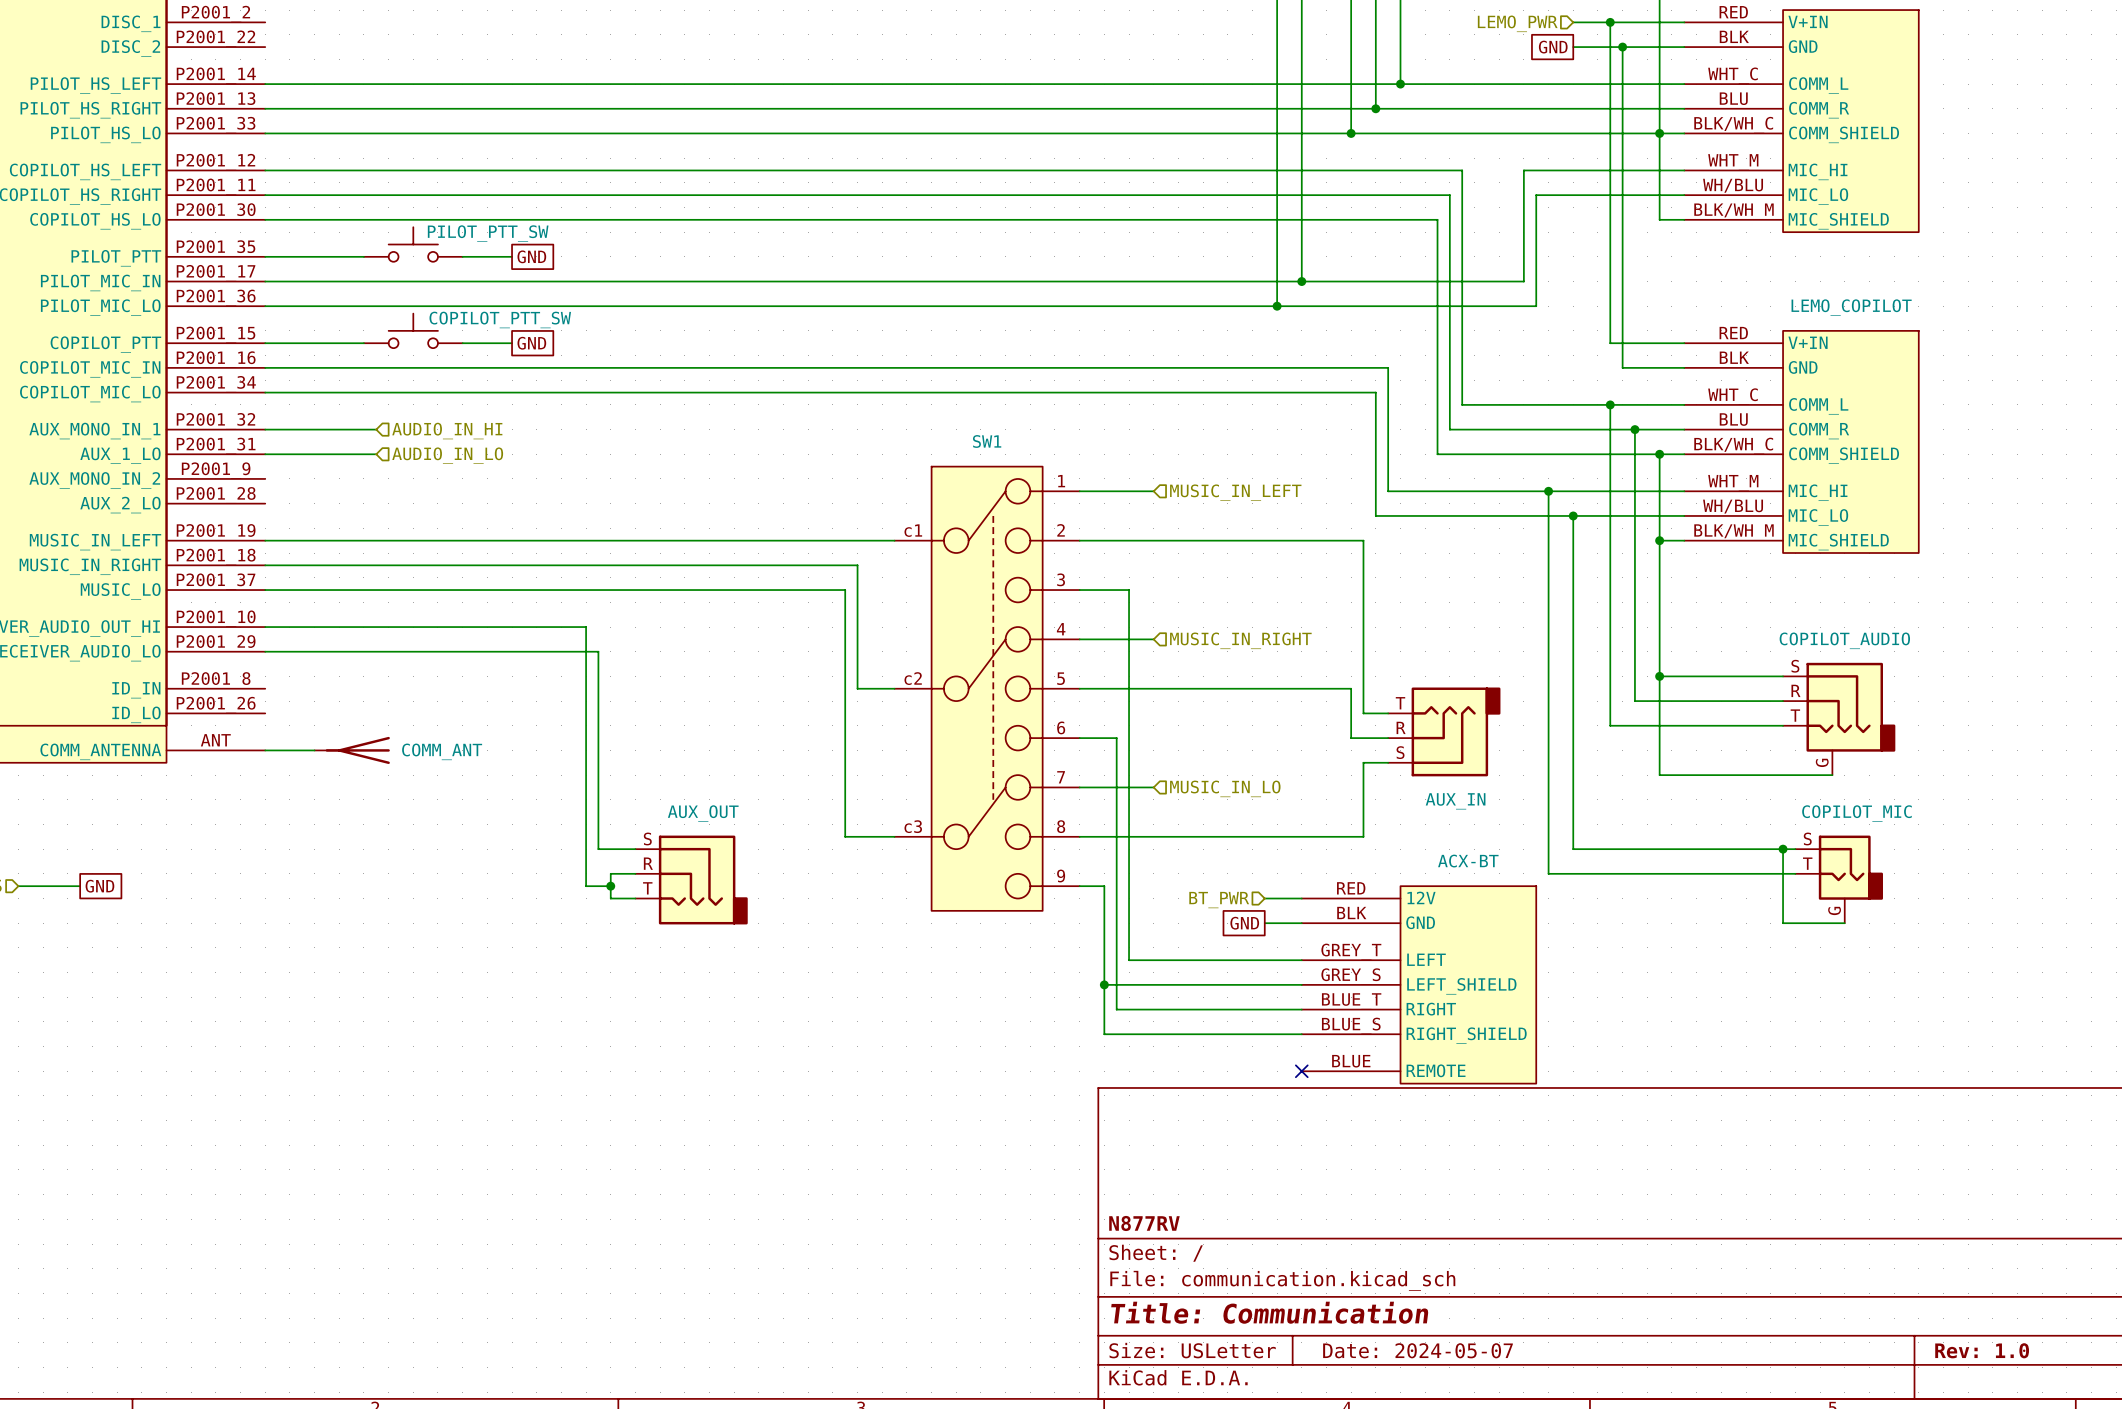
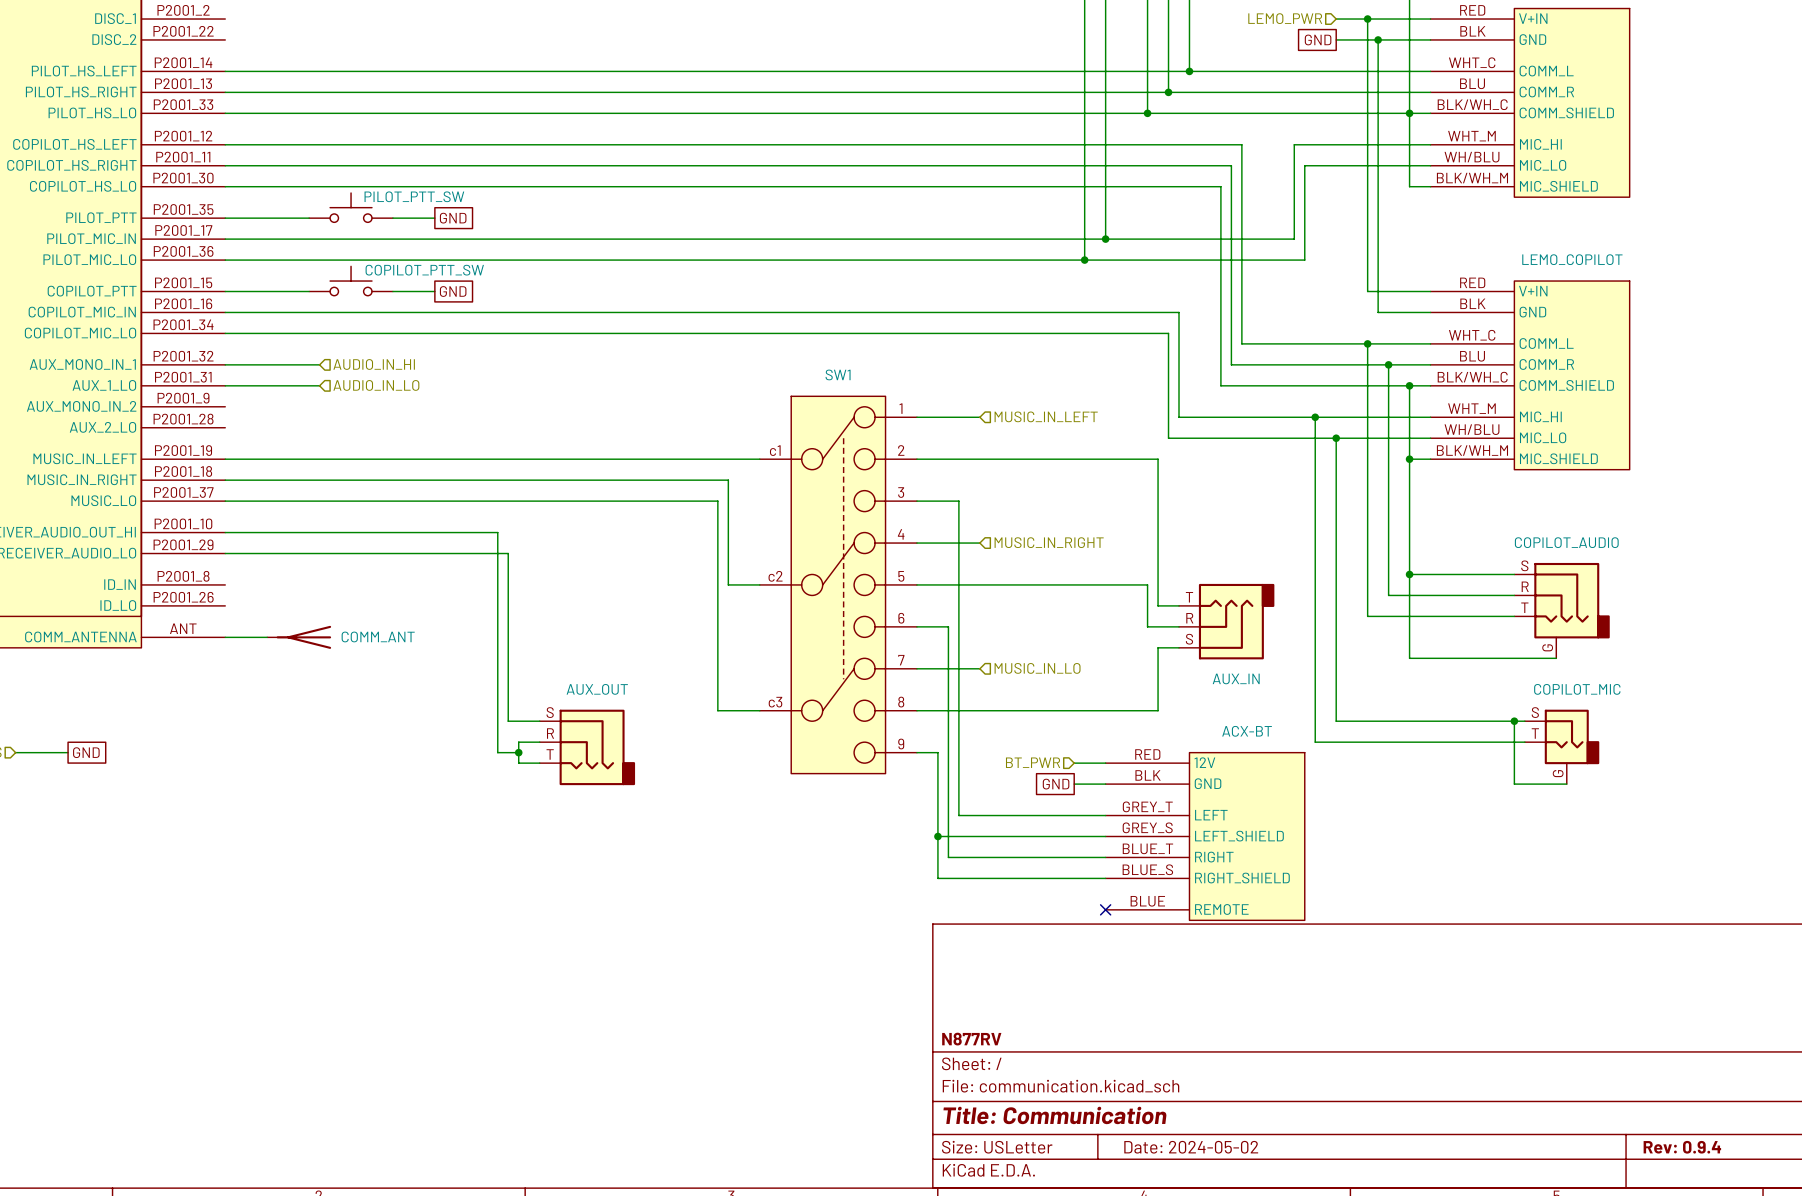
title block: Date: 2024-05-07 (1418, 1350) -> Date: 2024-05-02 (1191, 1147)
title block: Rev: 1.0 (1982, 1350) -> Rev: 0.9.4 (1682, 1147)

